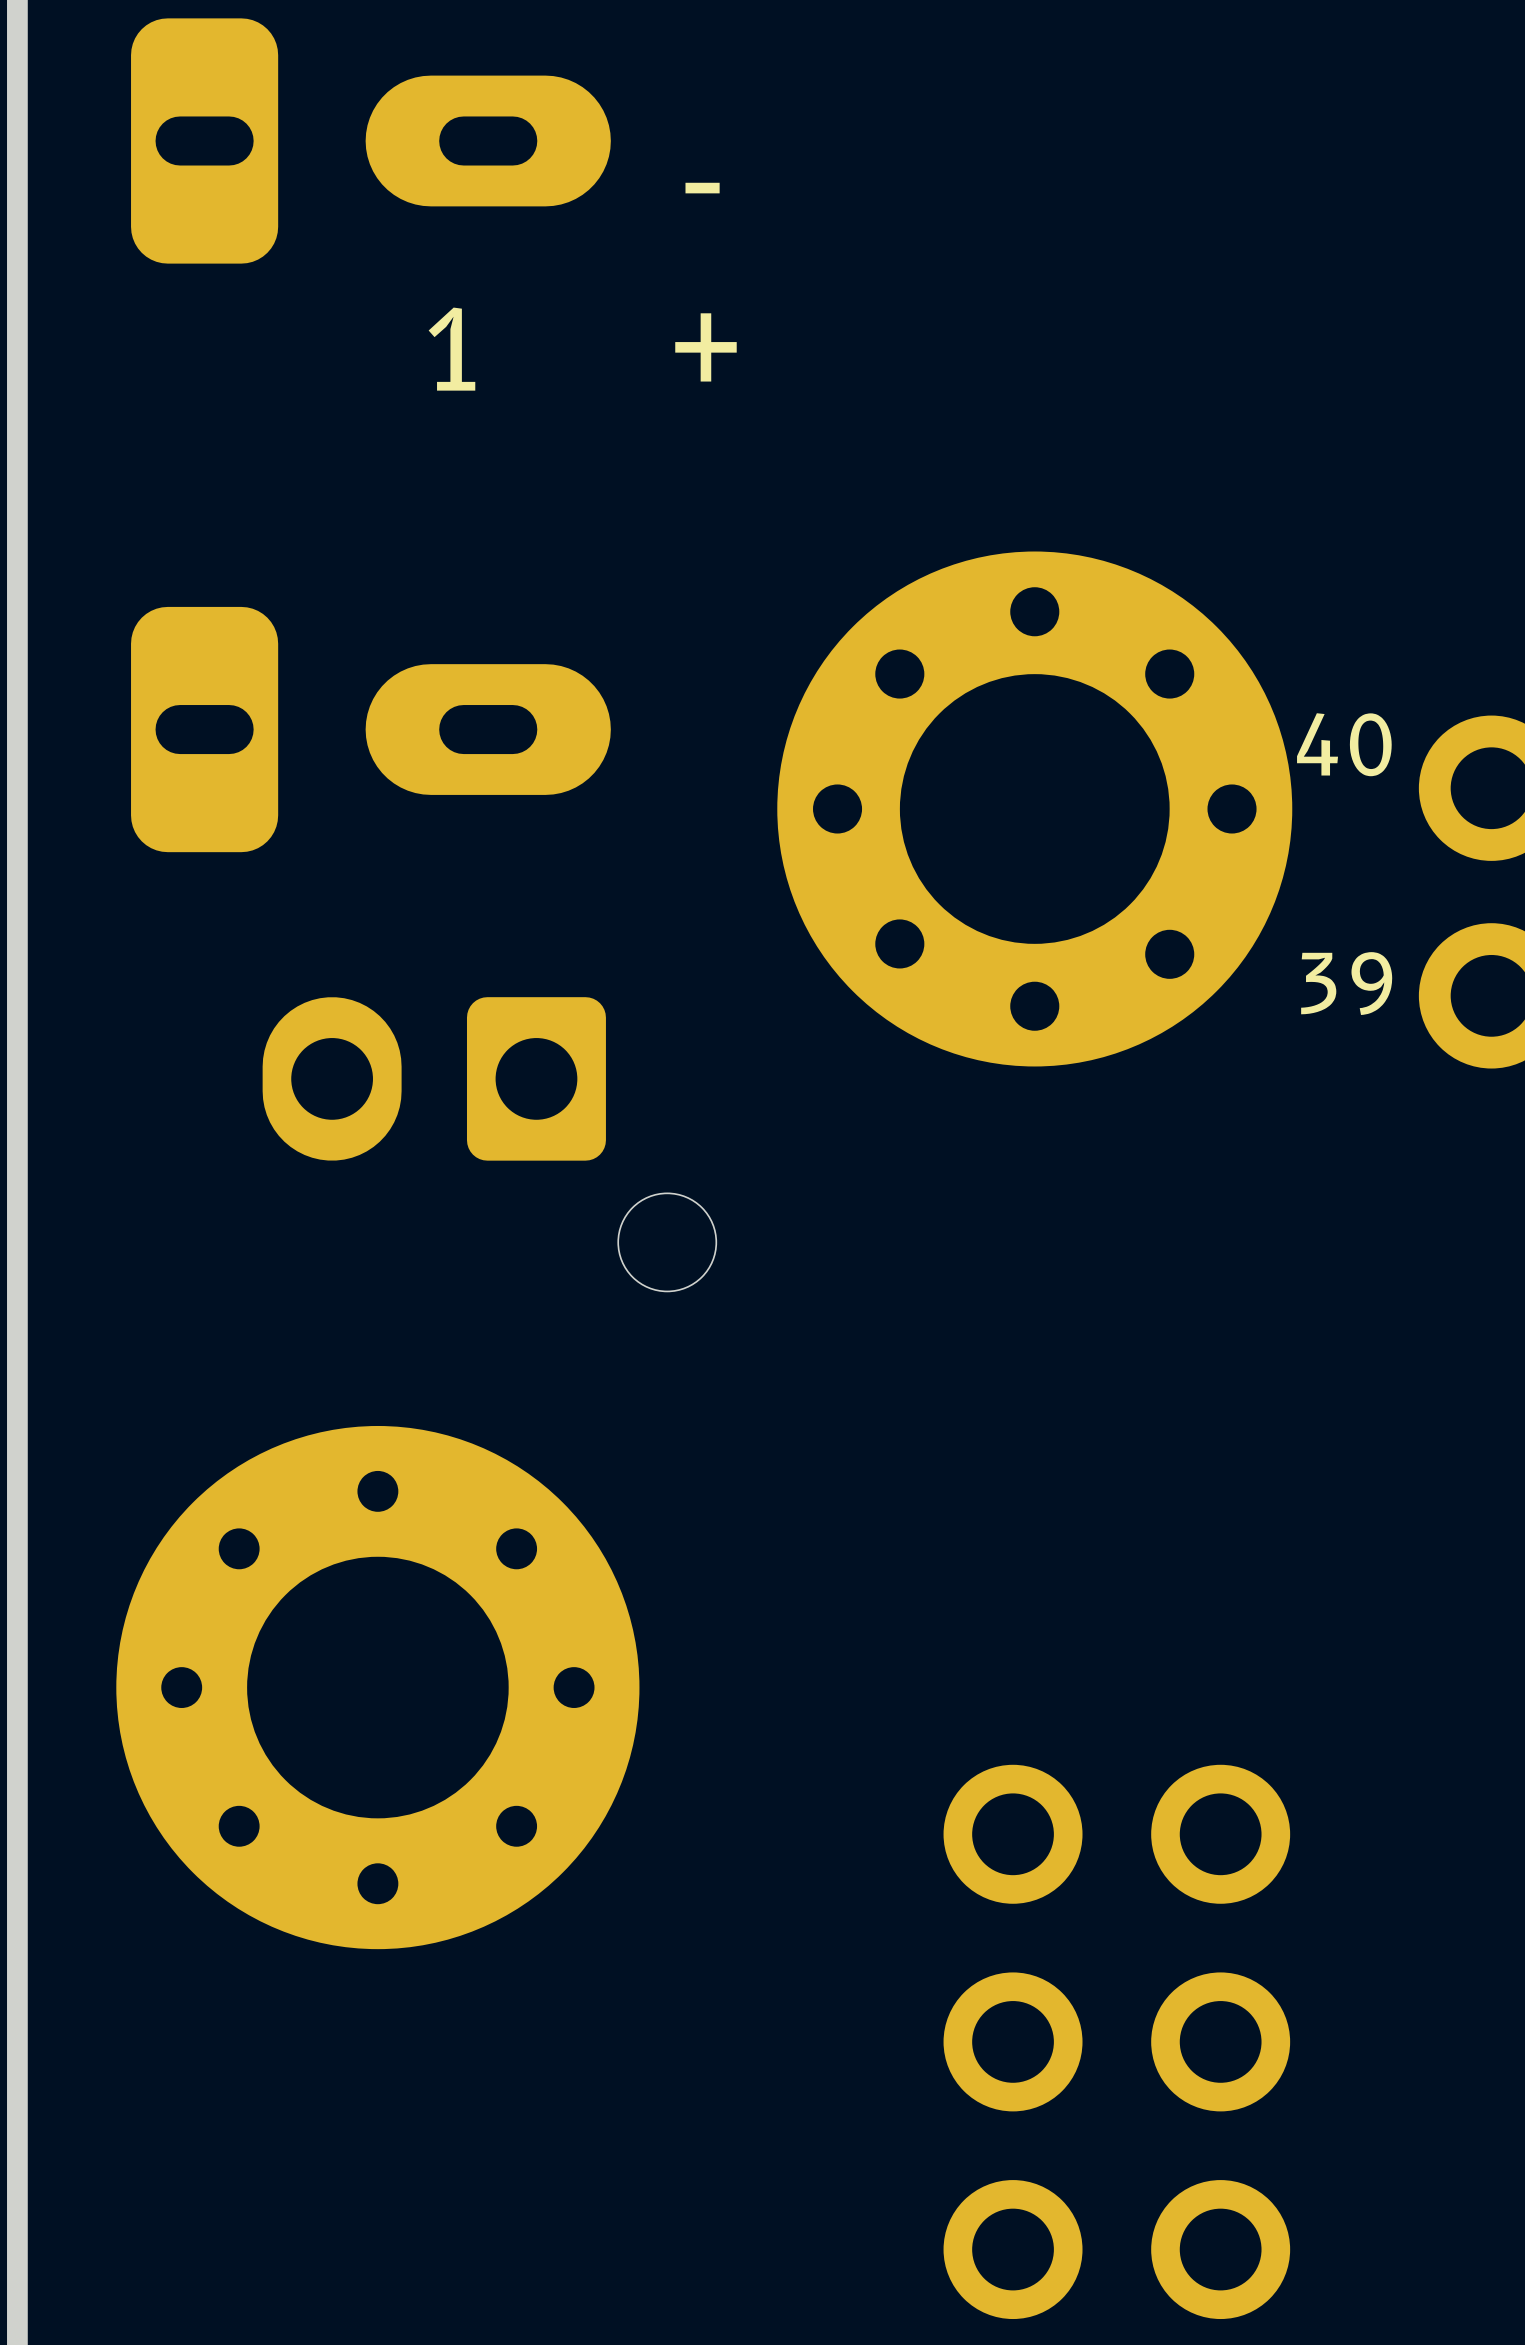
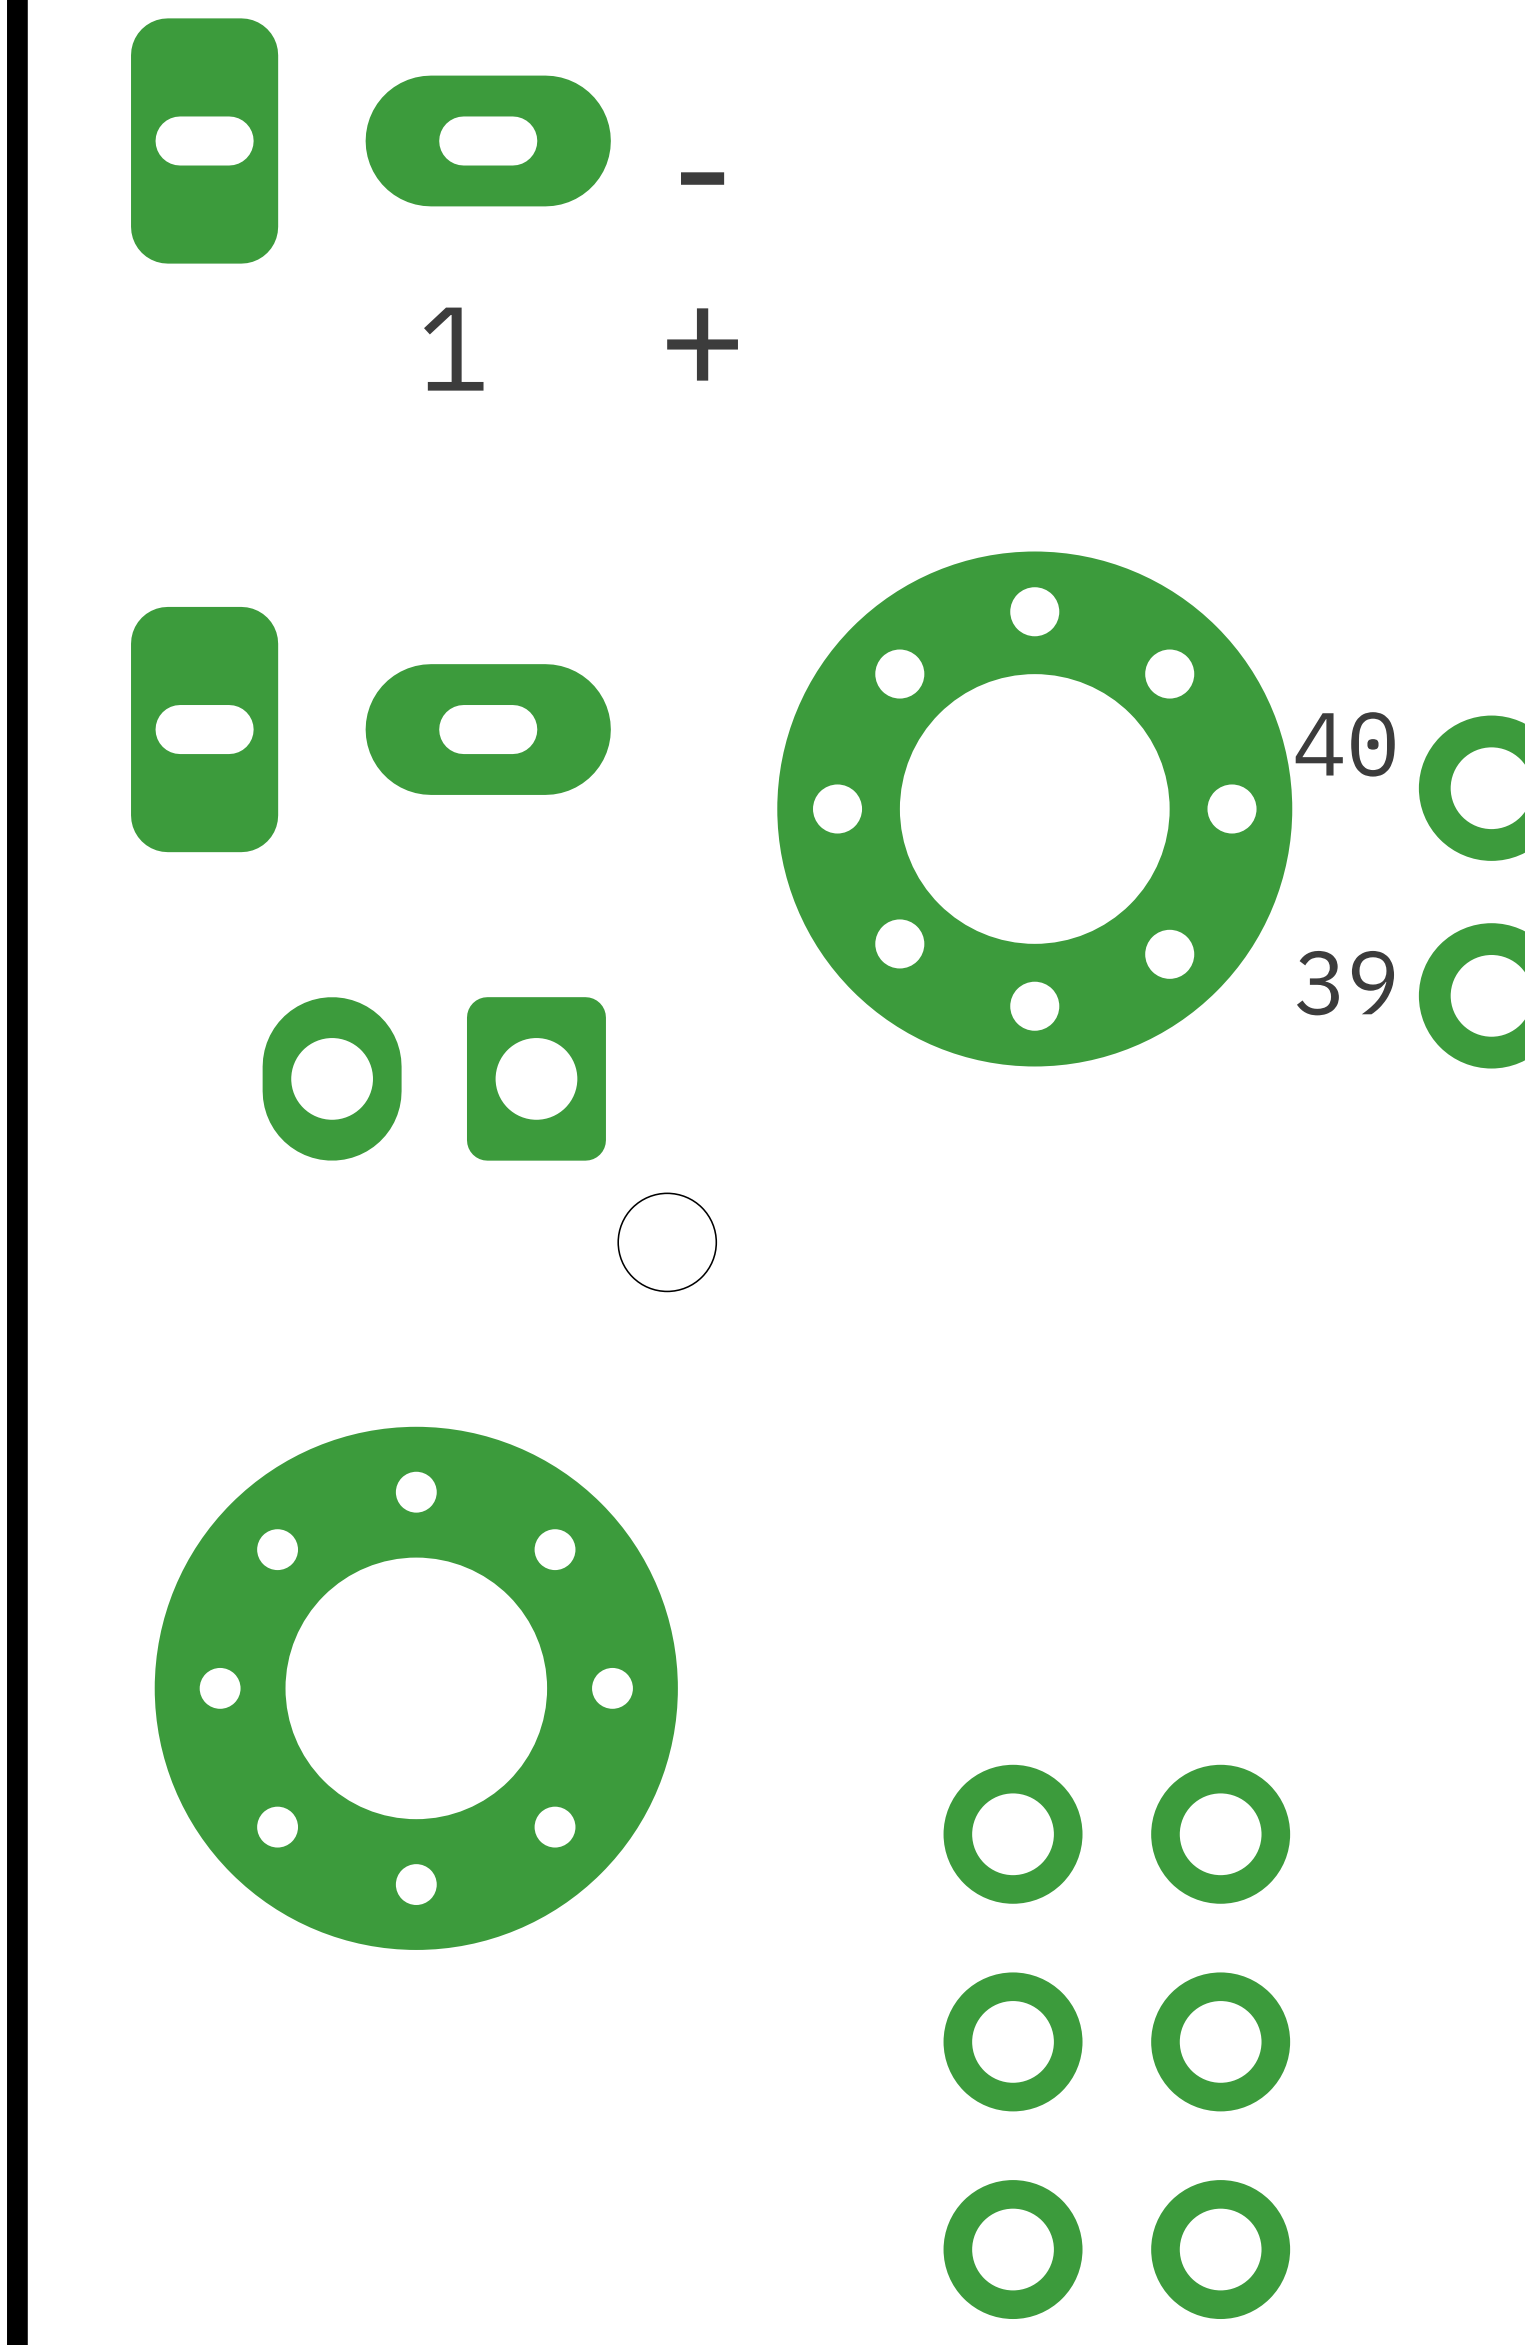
part position: (377, 1687) -> (416, 1688)

